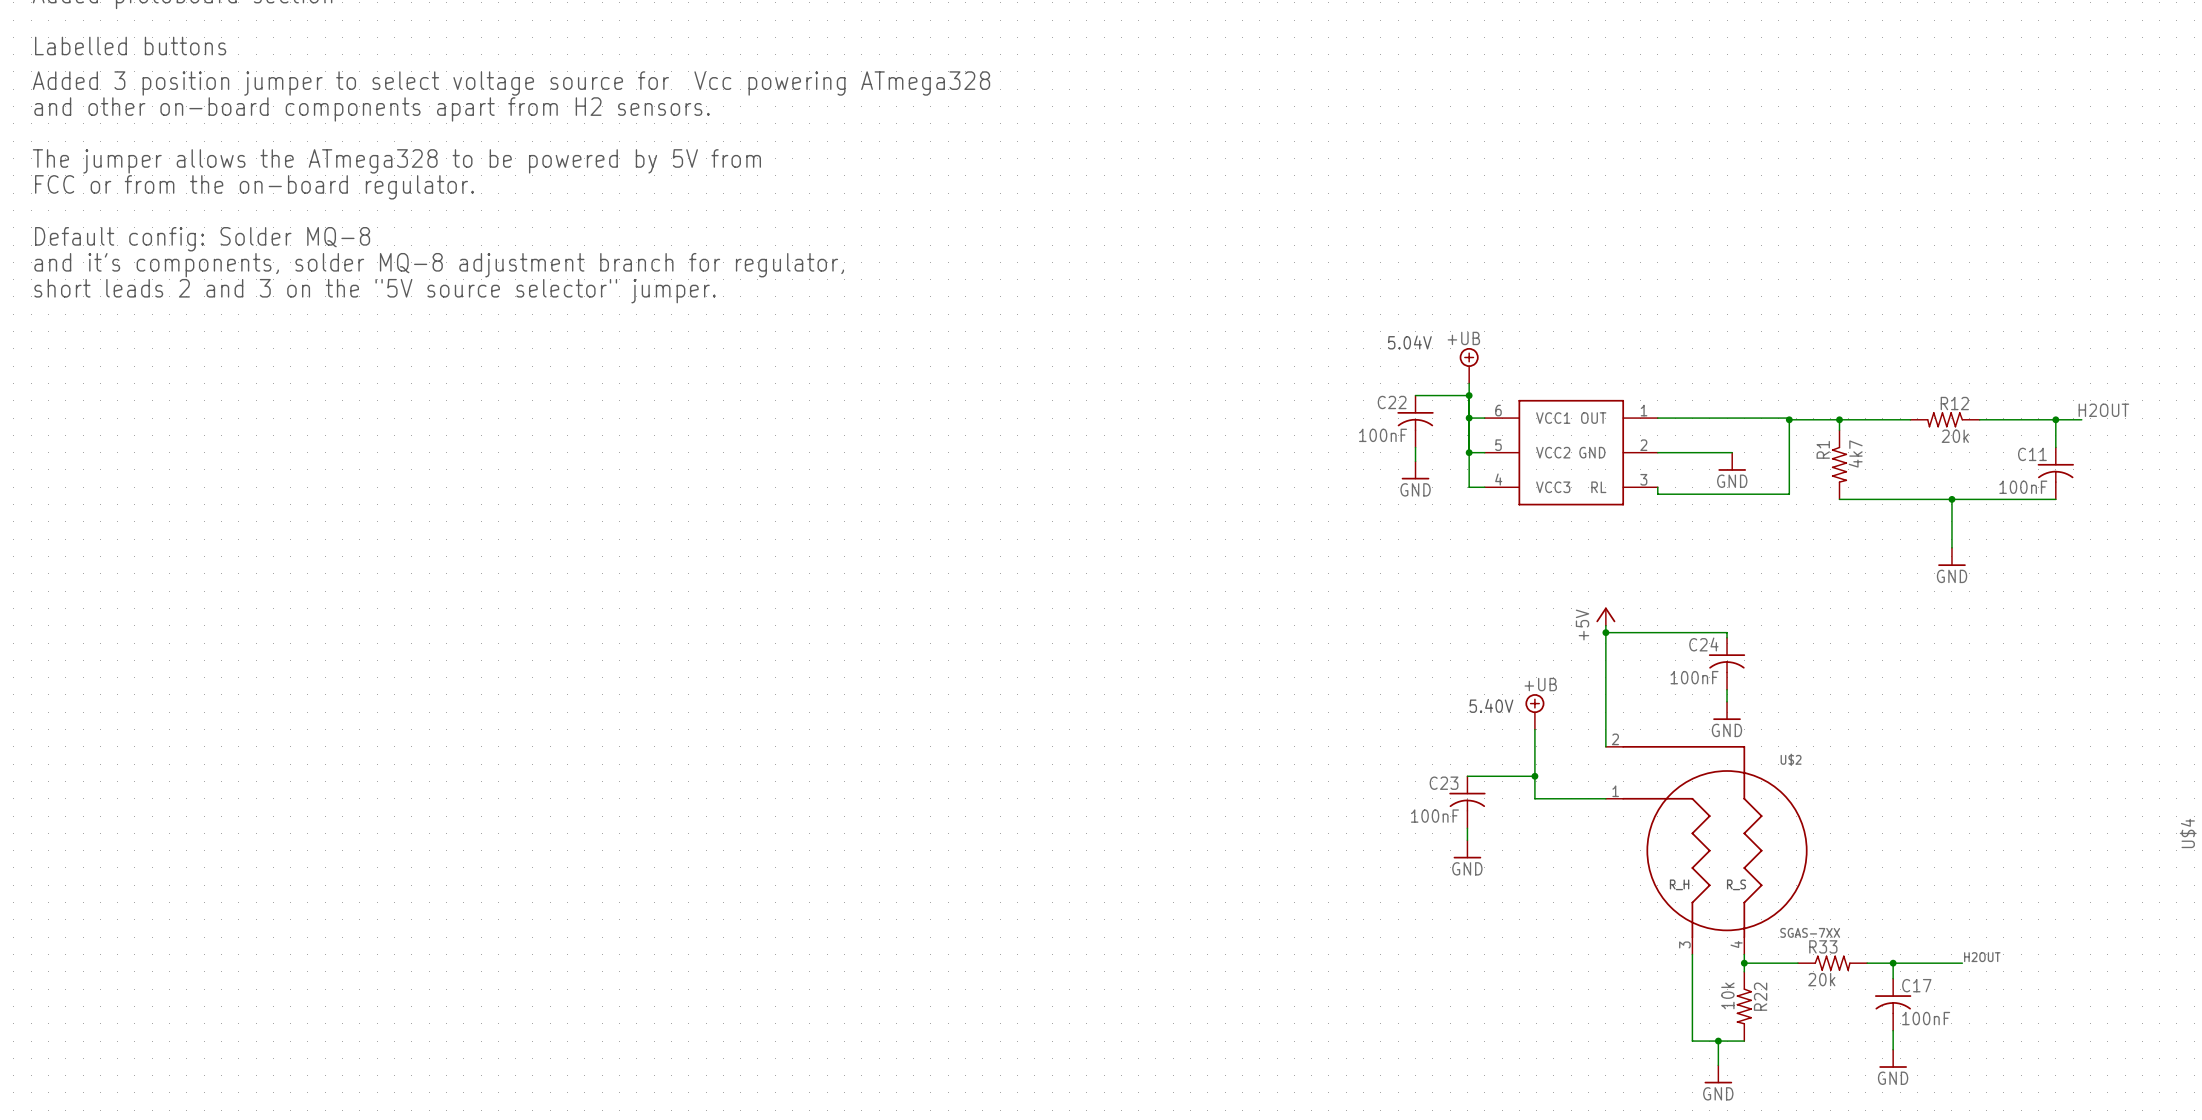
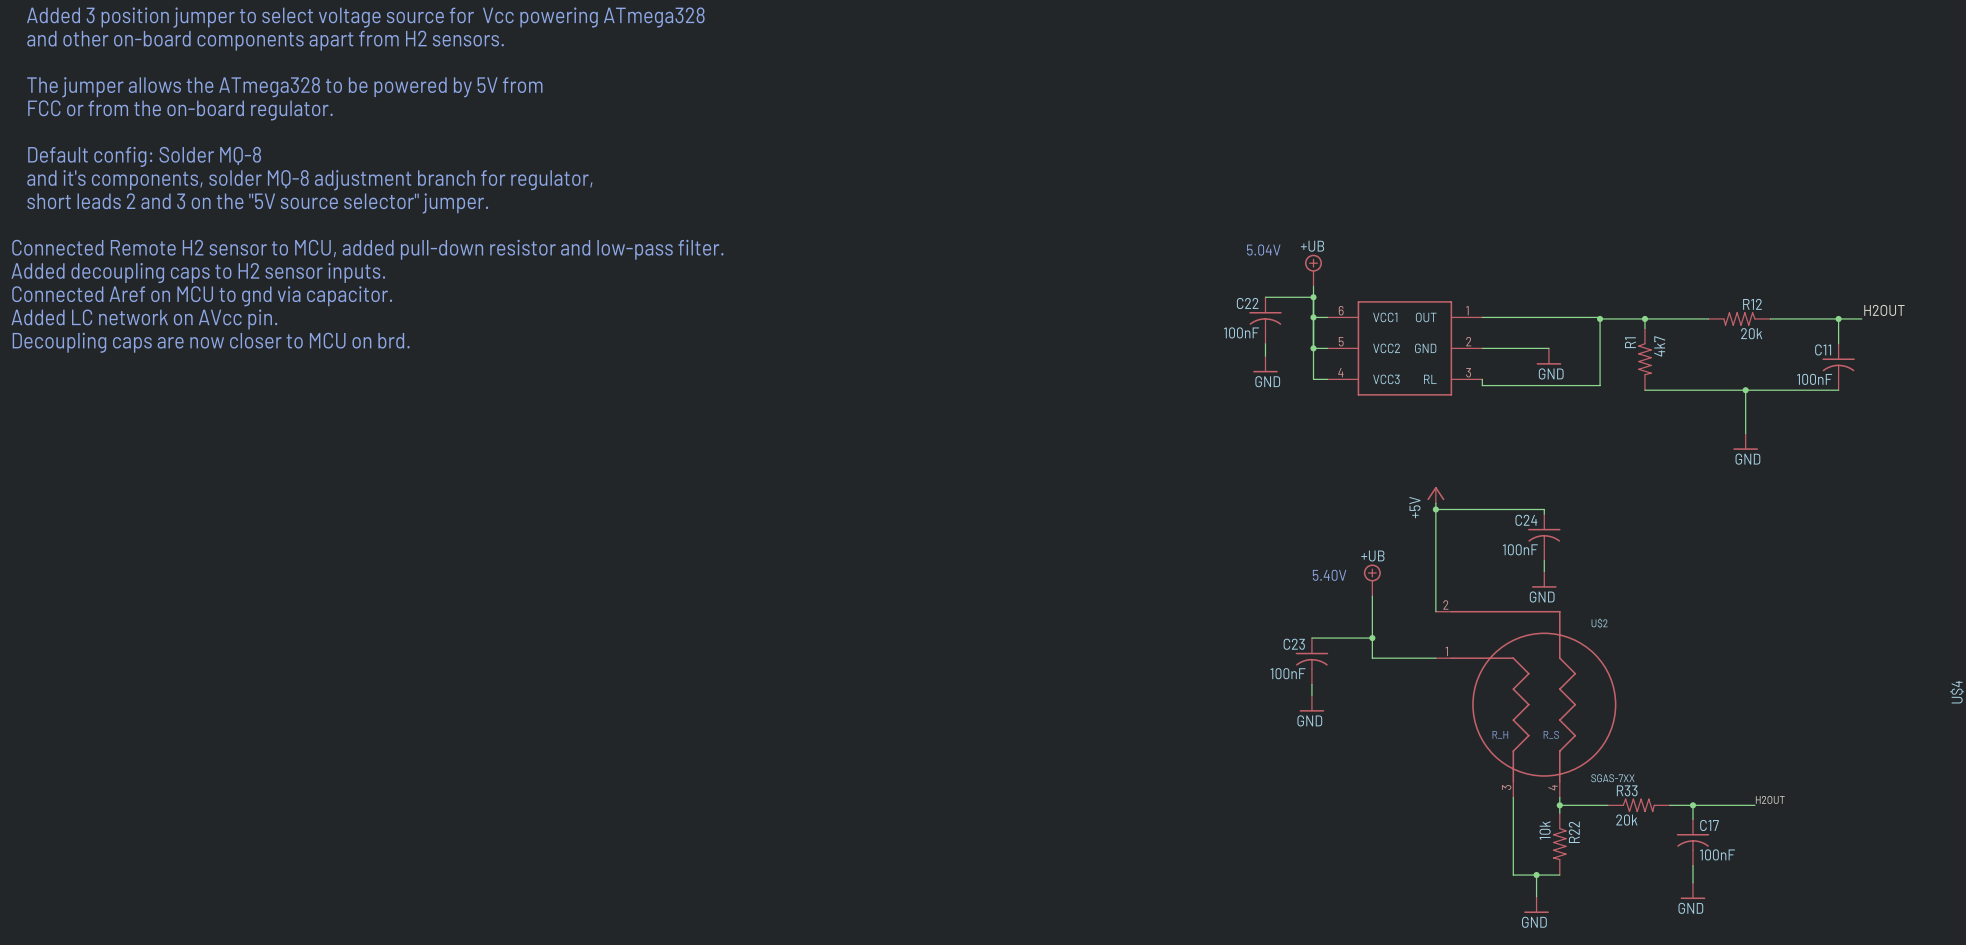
text: none -> Connected Remote H2 sensor to MCU, added pull-down resistor and low-pass filter. (367, 249)
text: none -> Added decoupling caps to H2 sensor inputs. (198, 273)
text: none -> Connected Aref on MCU to gnd via capacitor. (202, 296)
text: none -> Added LC network on AVcc pin. (144, 319)
text: none -> Decoupling caps are now closer to MCU on brd. (211, 342)

